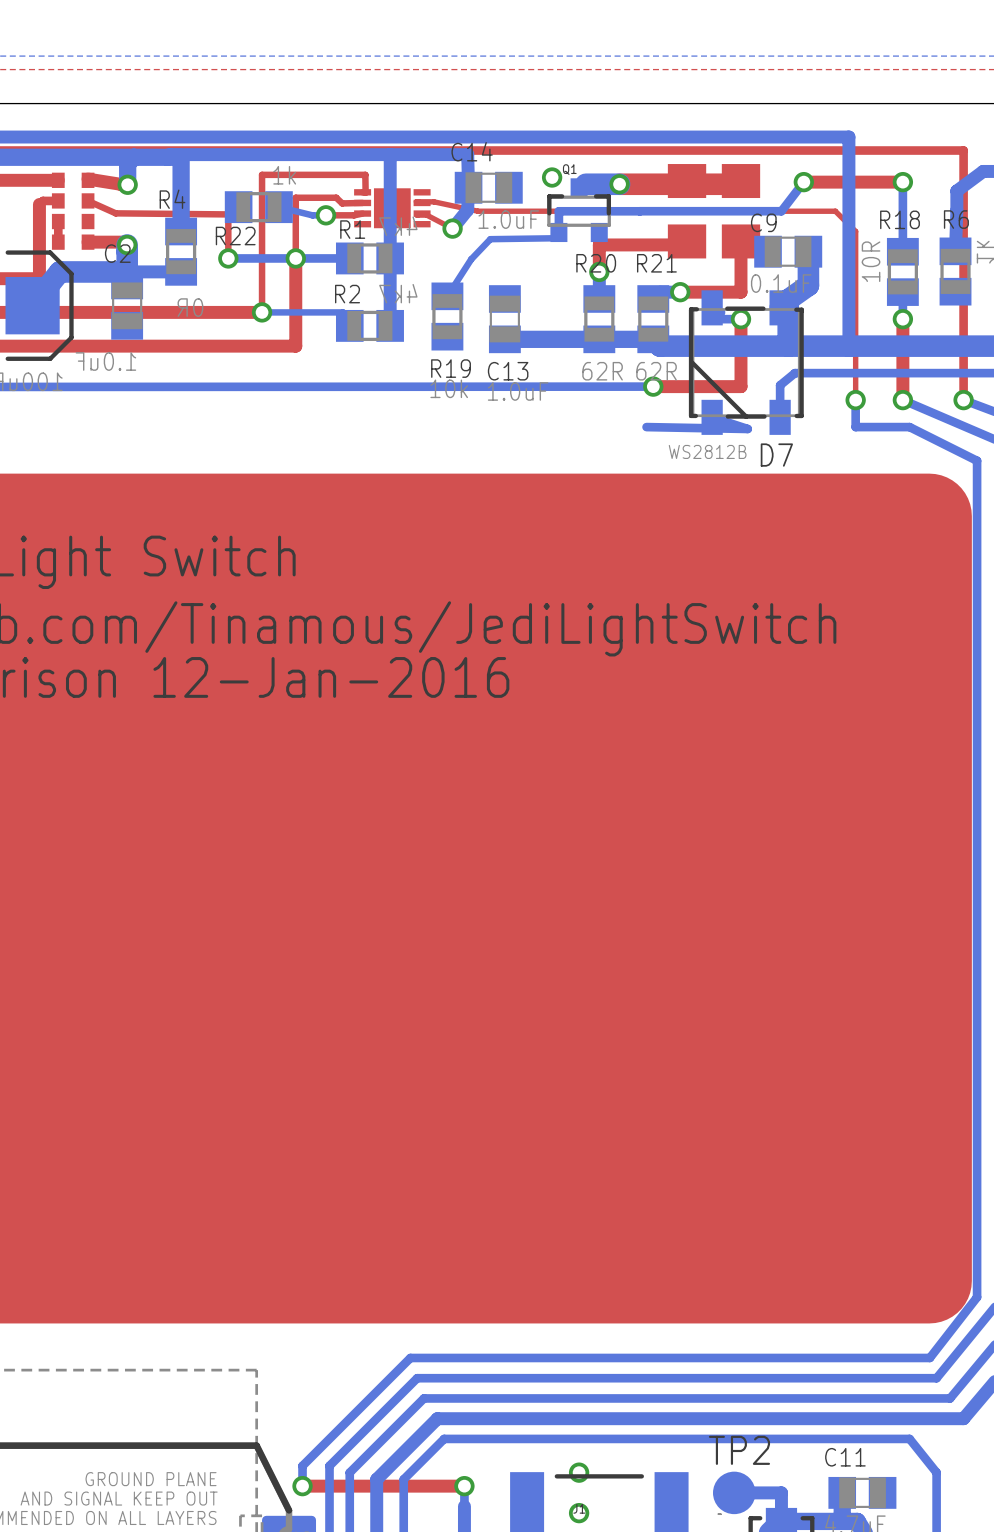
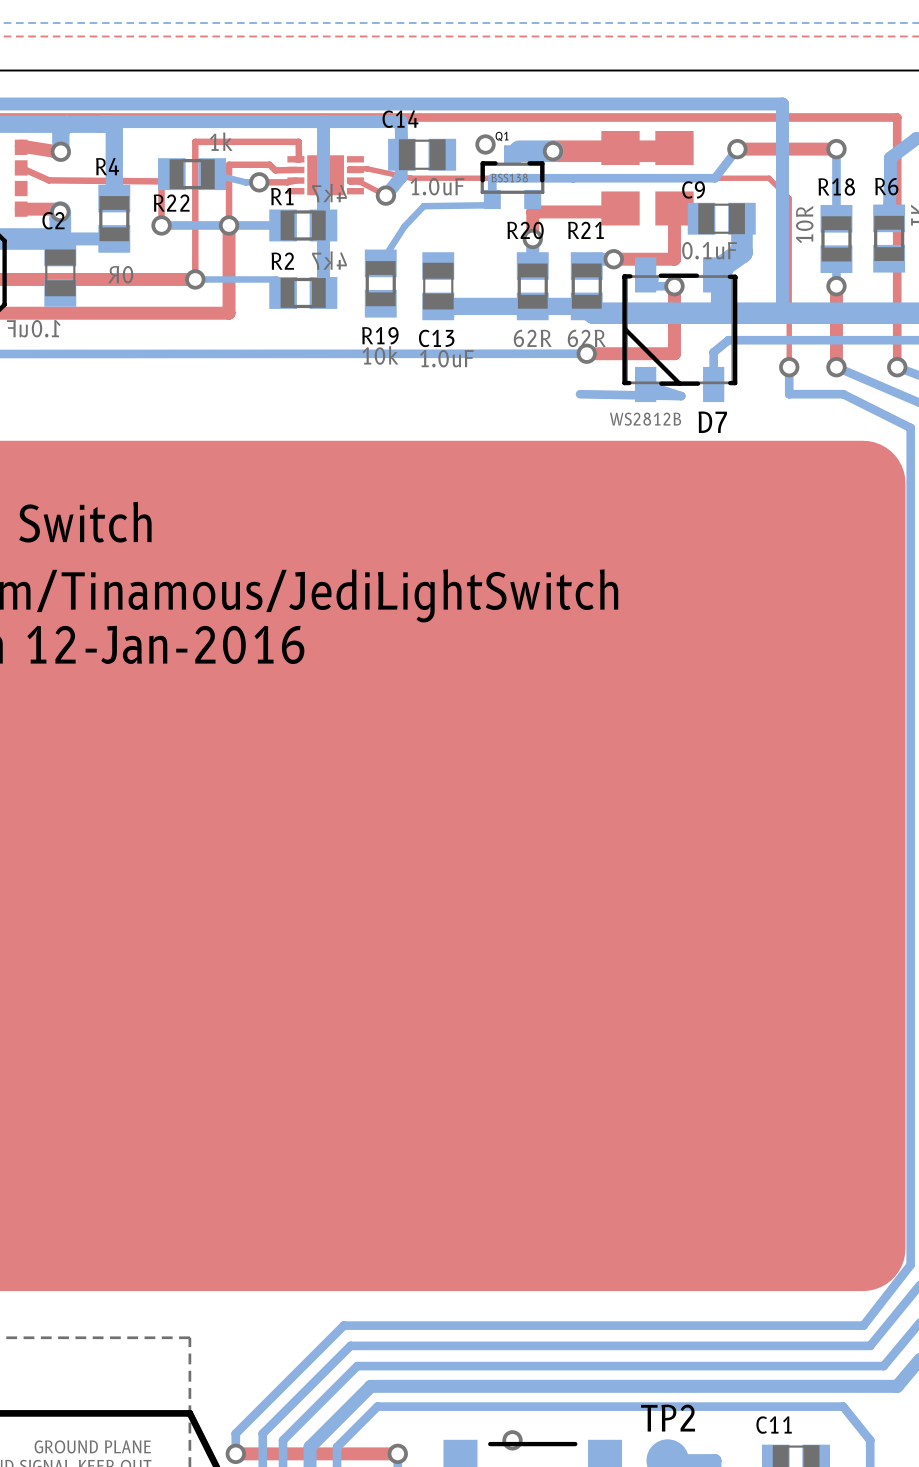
Q1 value: none -> BSS138 (509, 178)

